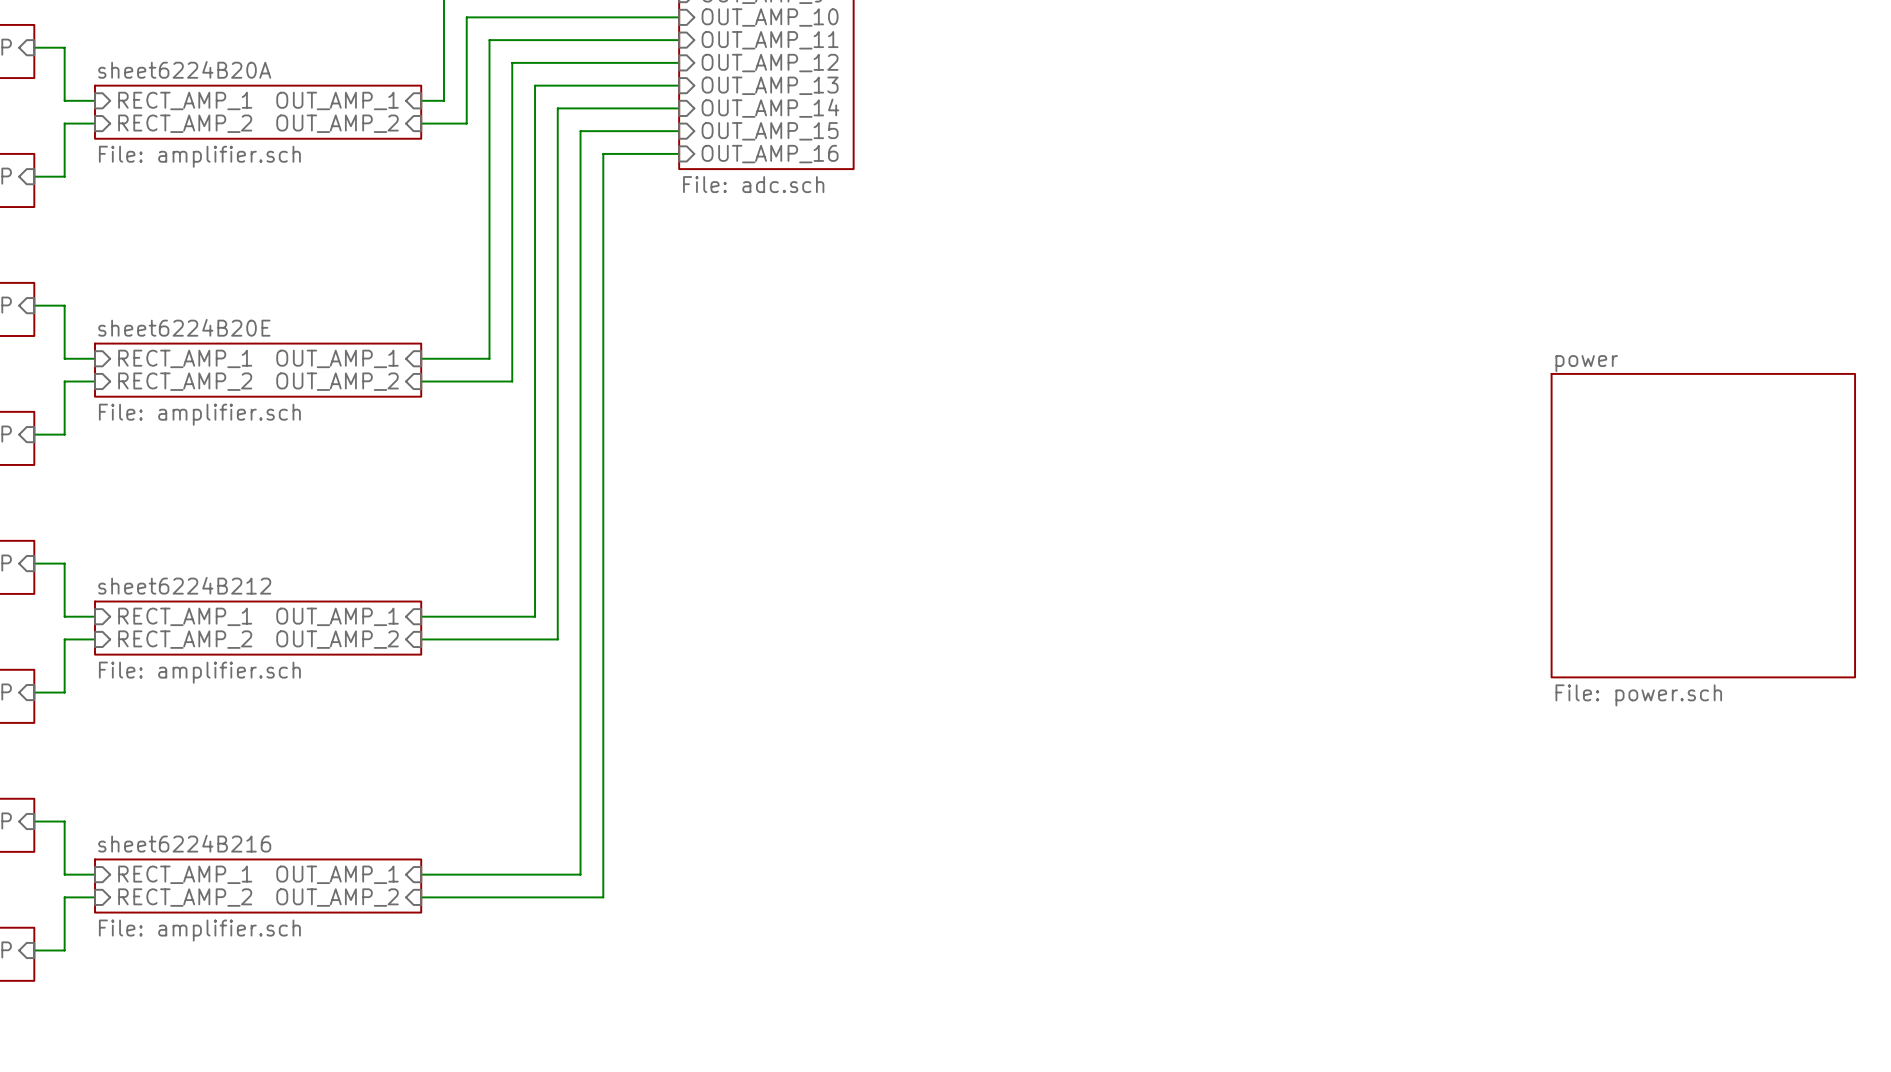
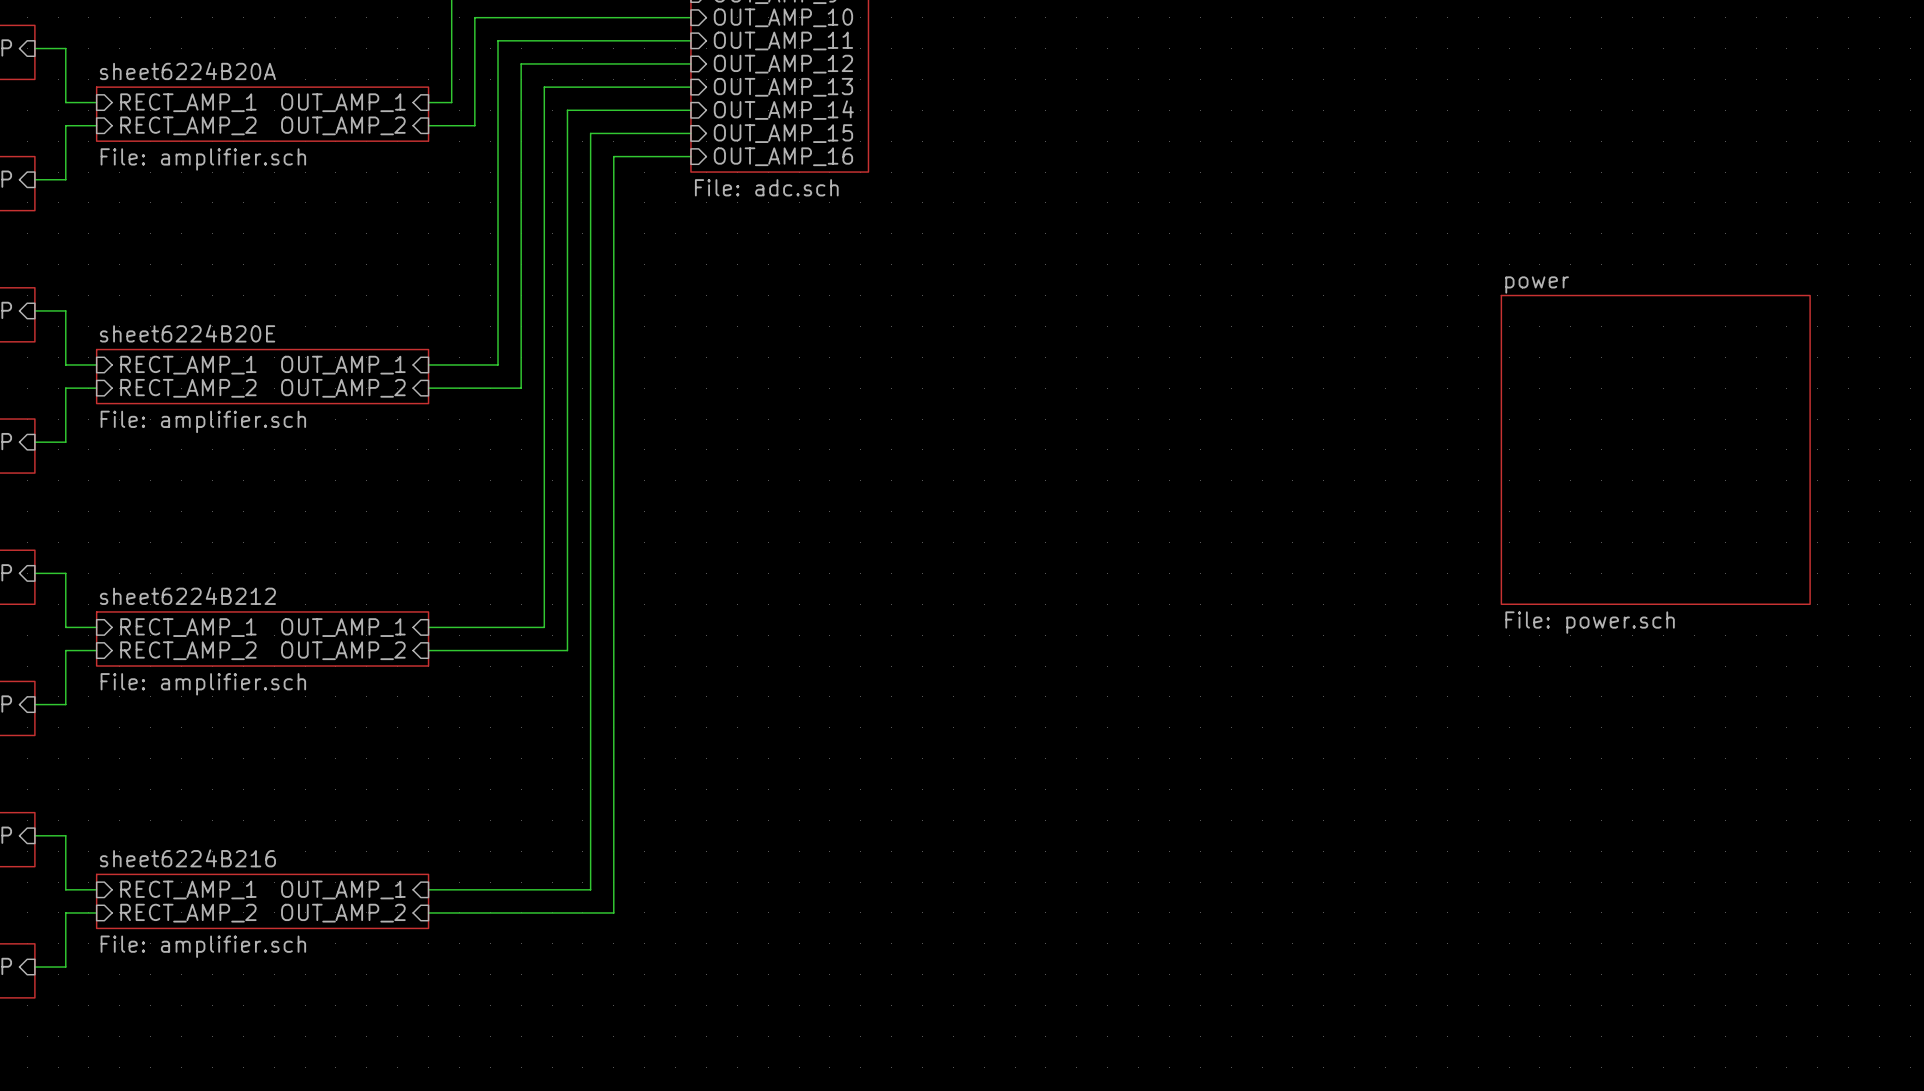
sheet power position: (1703, 525) -> (1655, 449)

